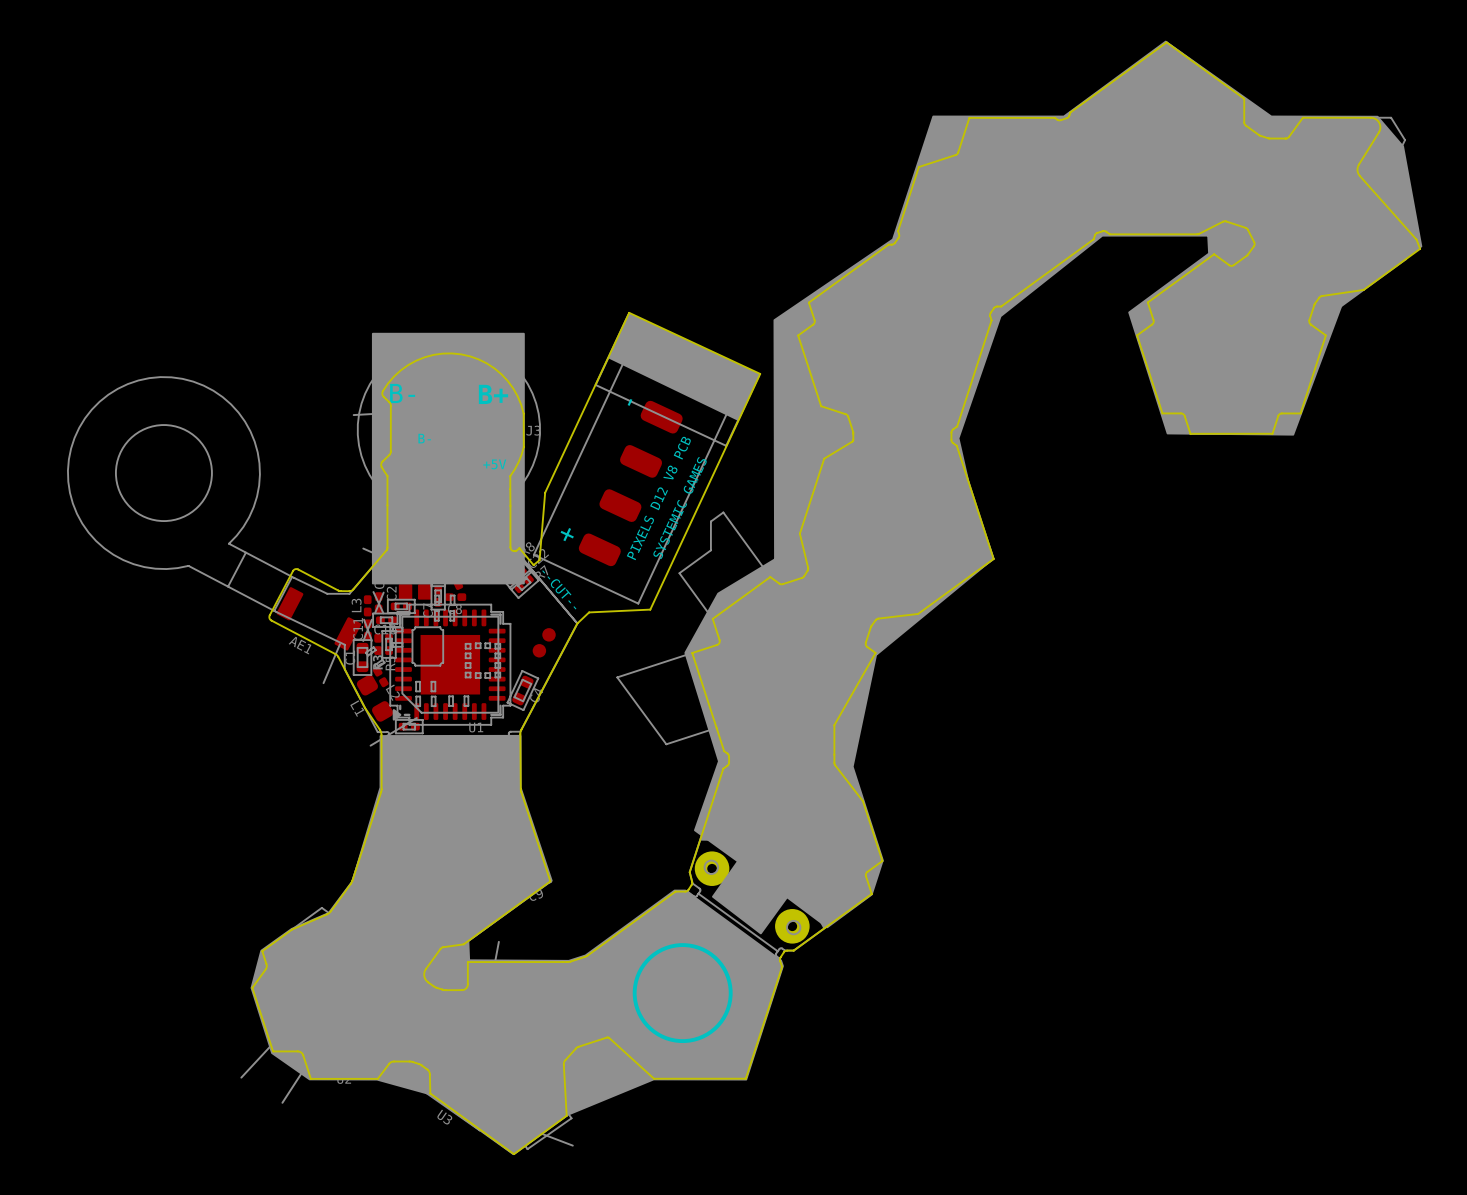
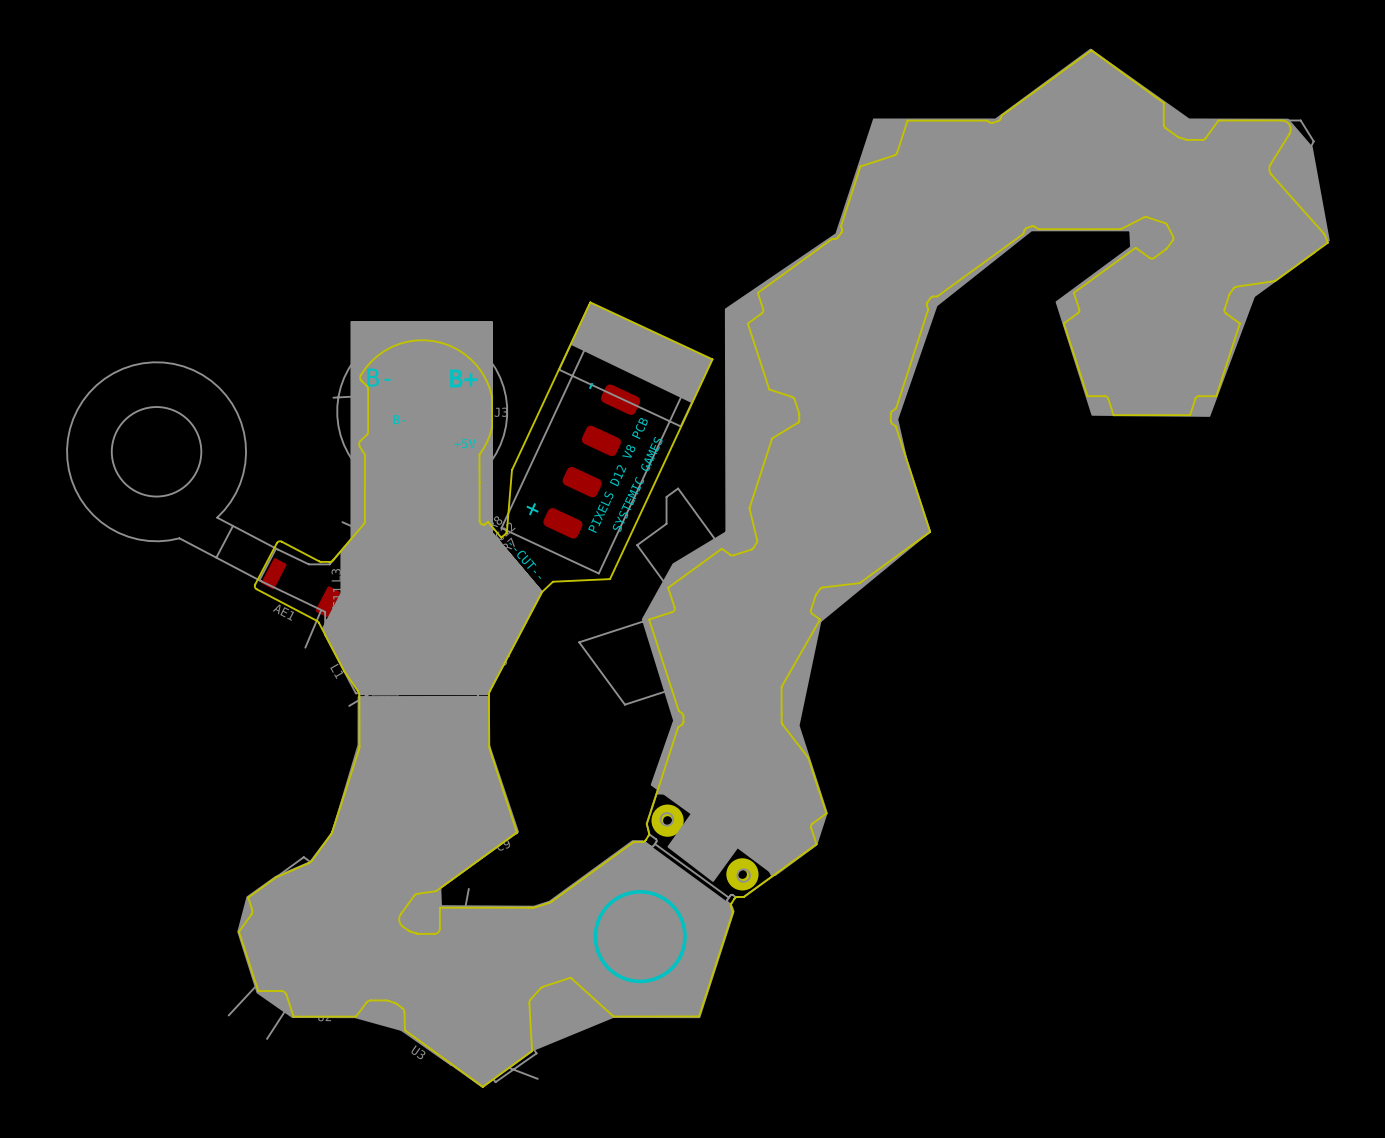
drawing: none -> [322, 523, 542, 696]

